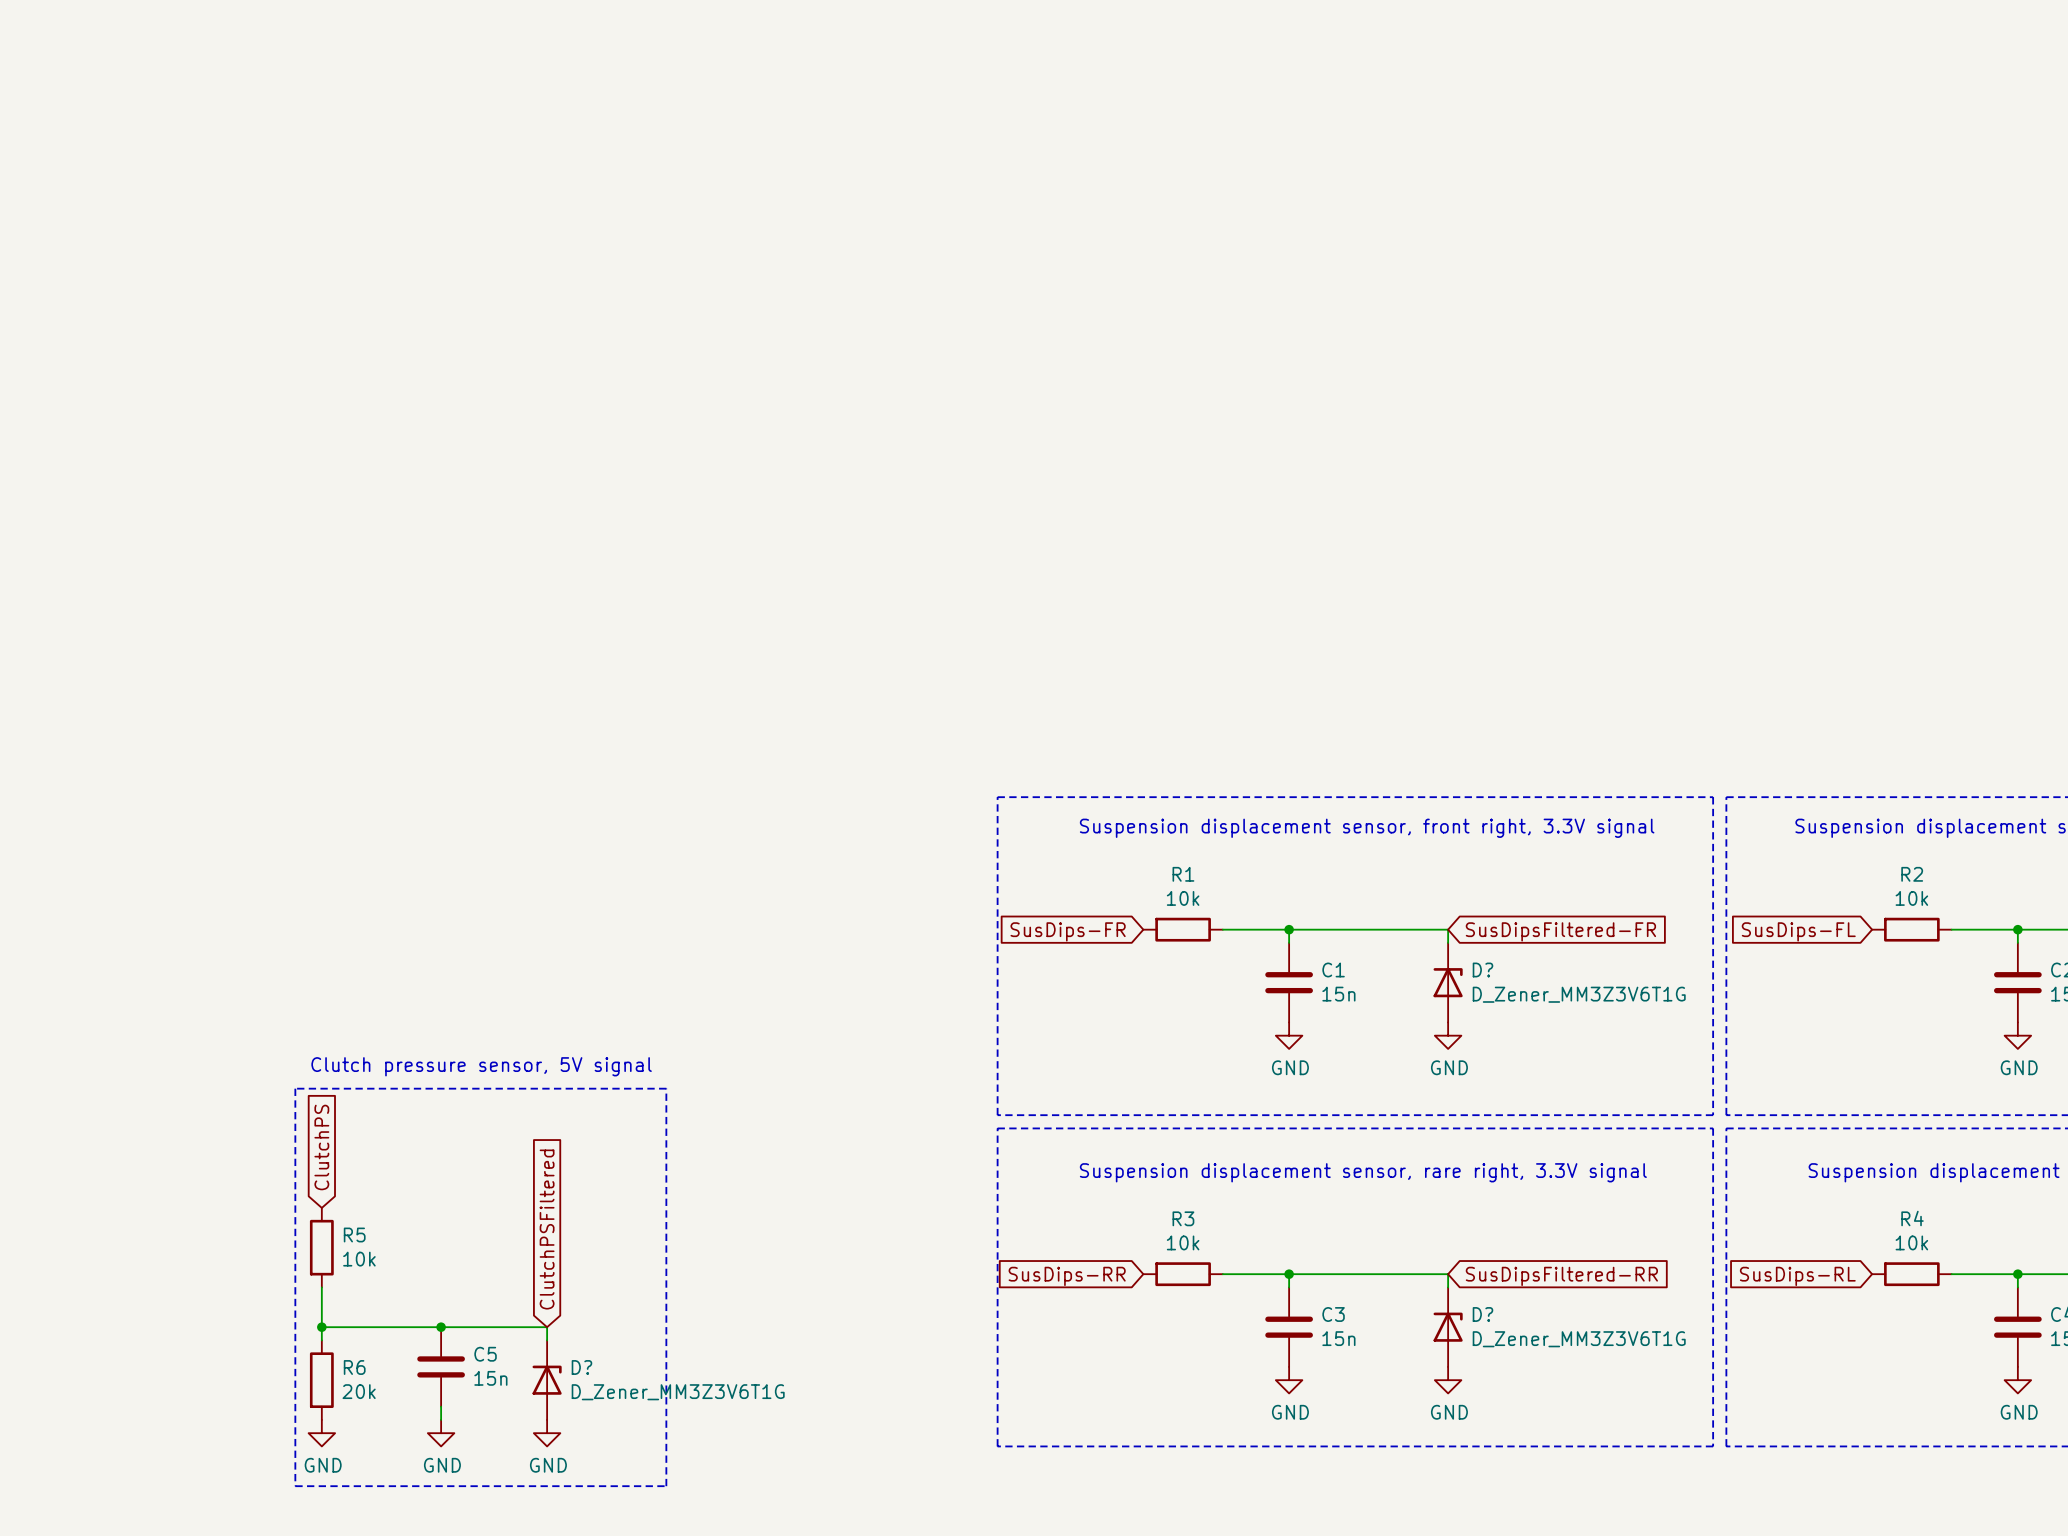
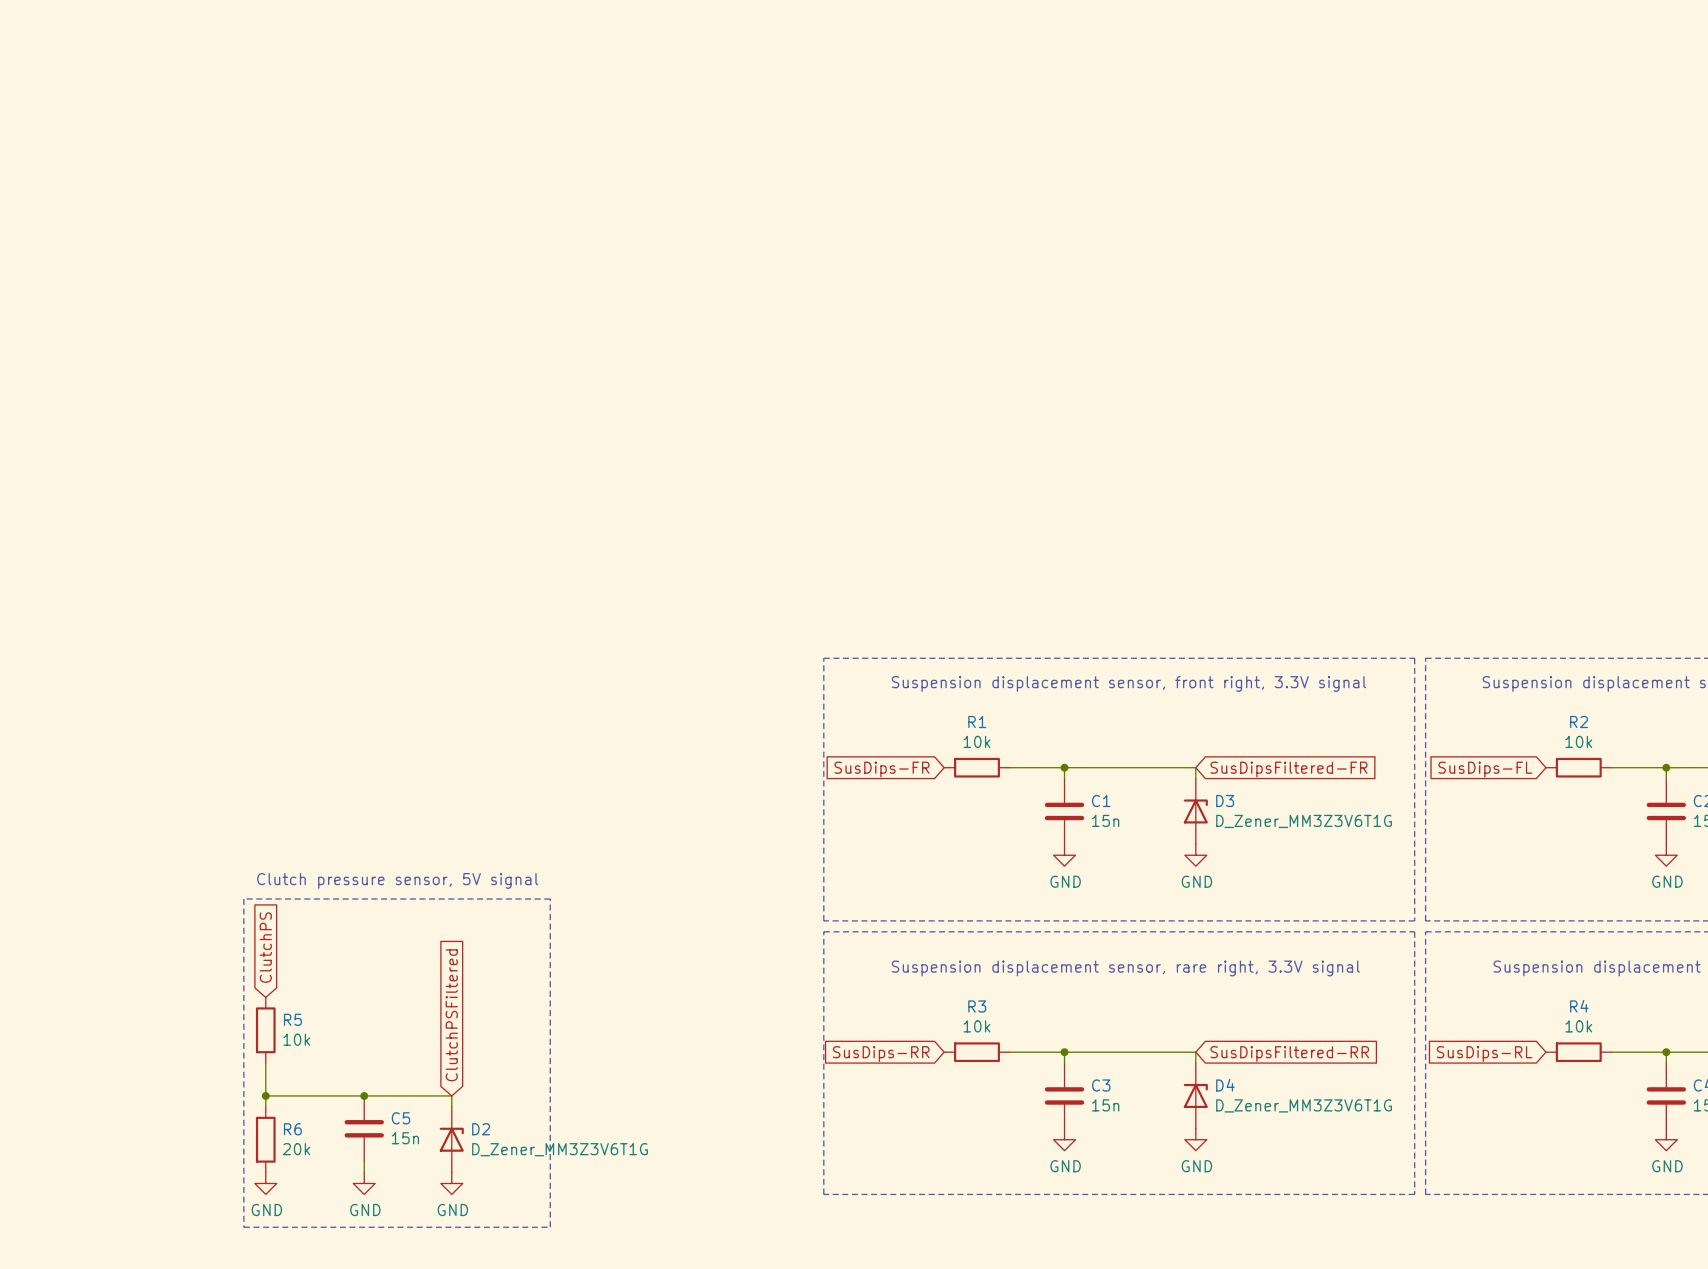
D? name: D? (1482, 969) -> D3 (1225, 801)
D? name: D? (1482, 1314) -> D4 (1225, 1085)
D? name: D? (581, 1367) -> D2 (481, 1129)

